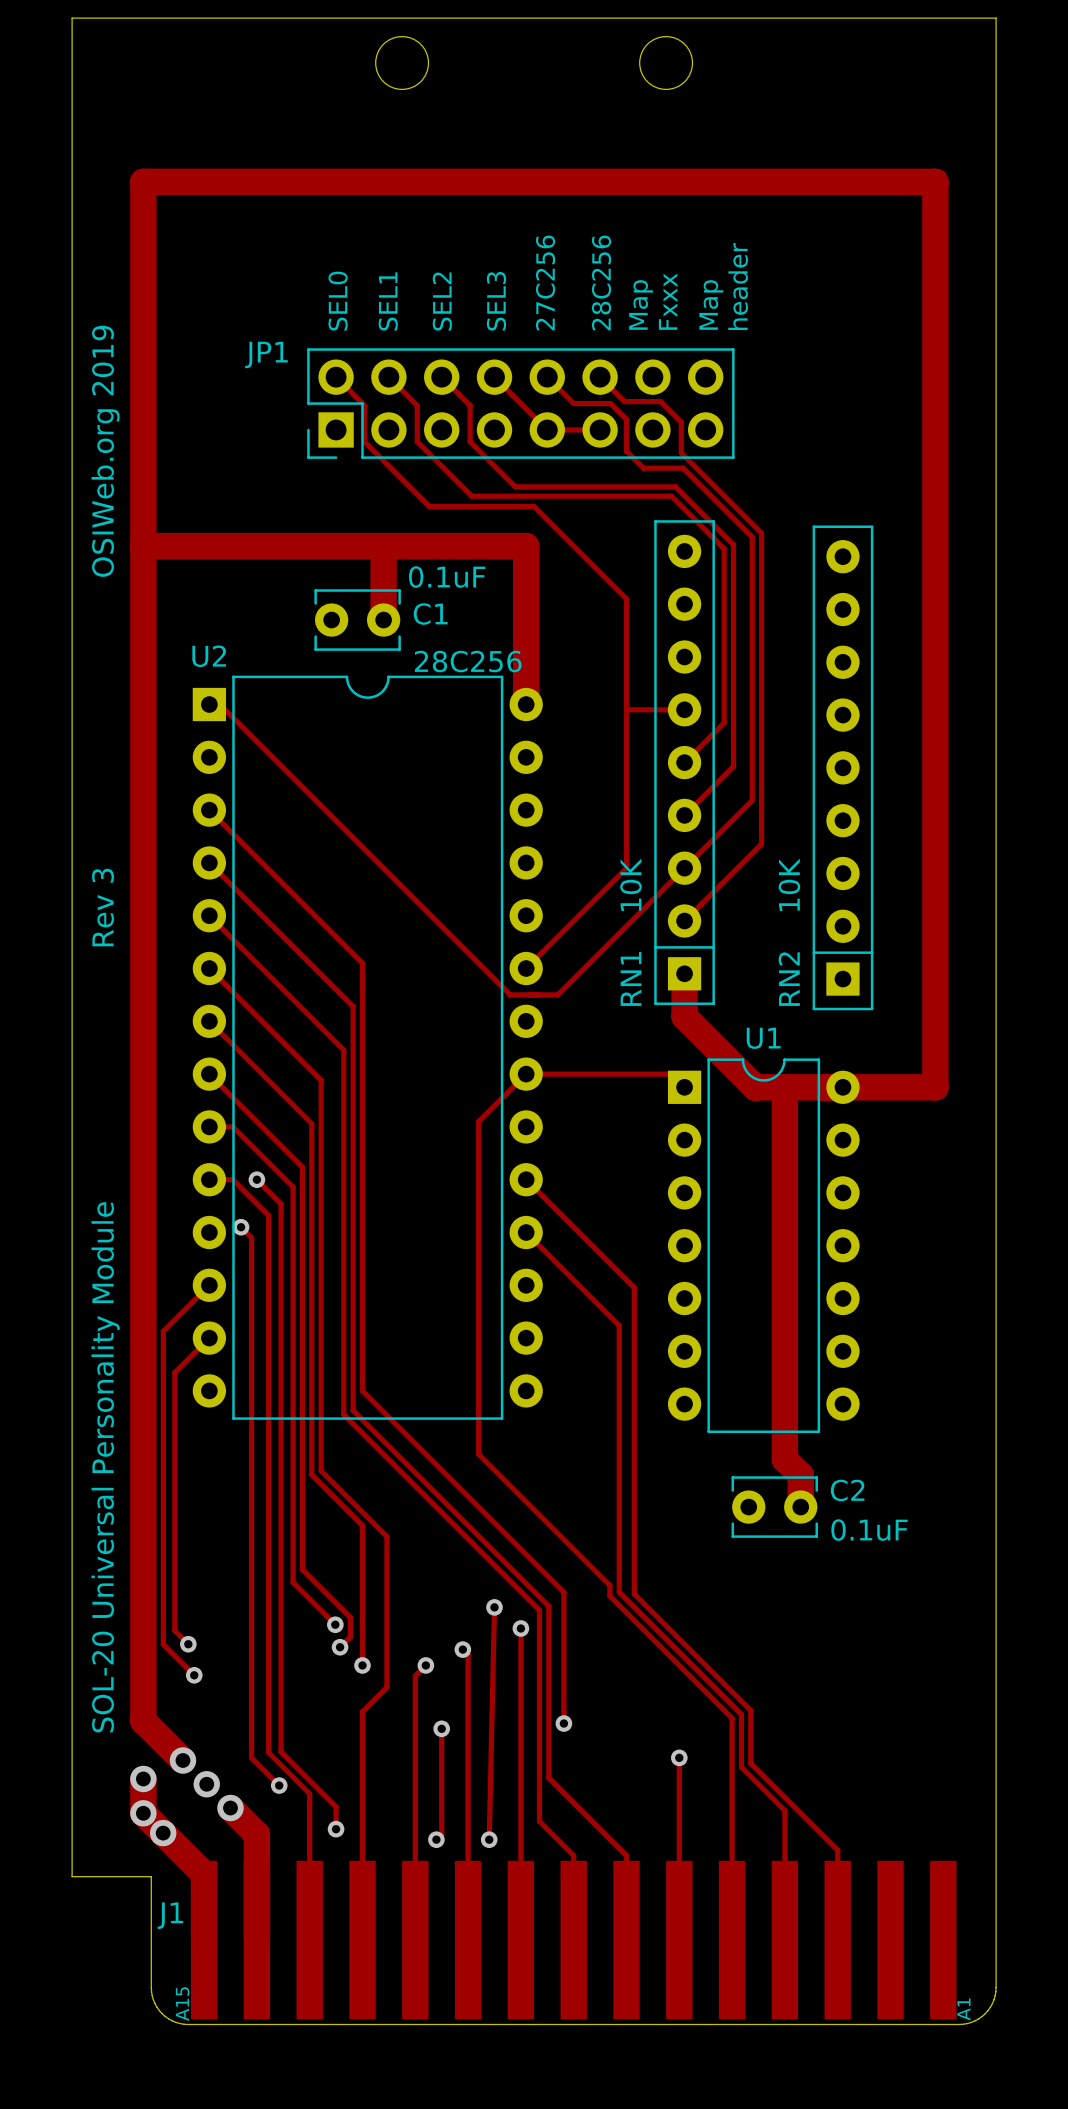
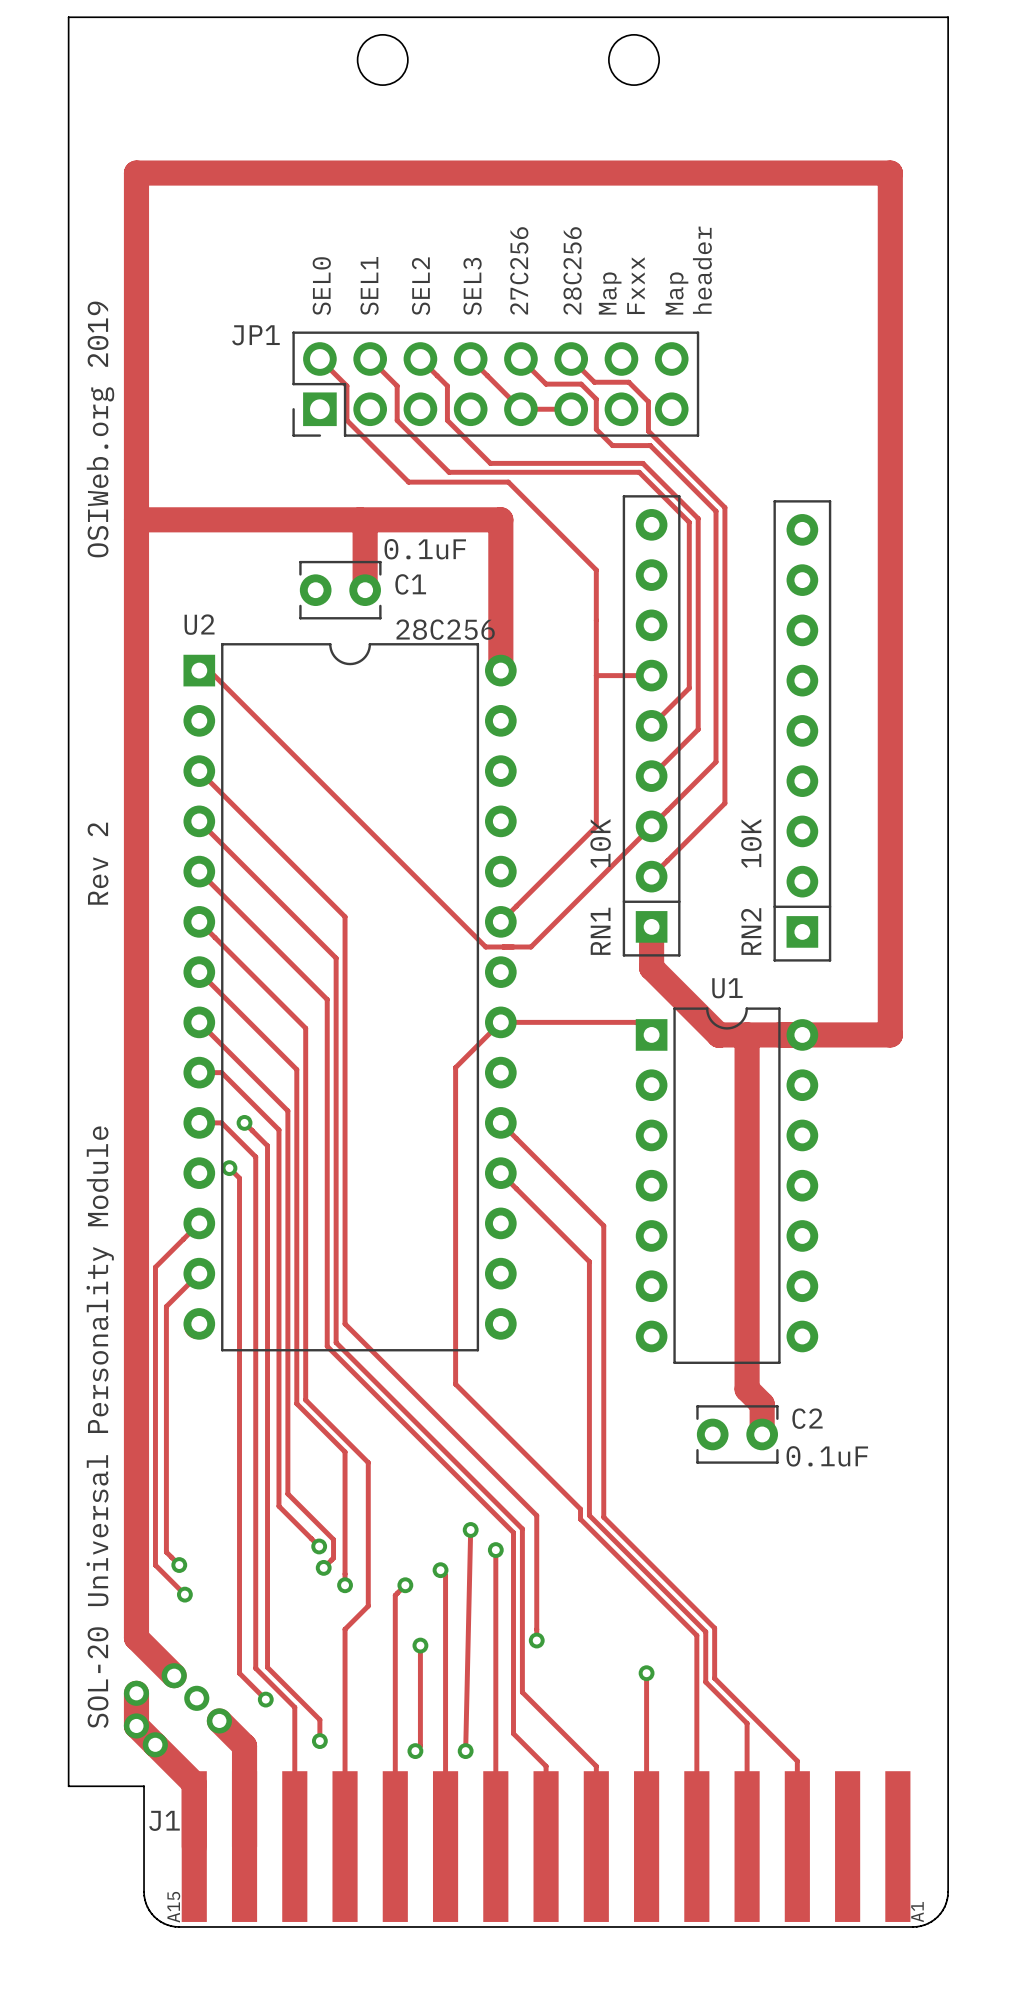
text: Rev 3 (103, 907) -> Rev 2 (98, 863)
text position: SOL-20 Universal Personality Module (105, 1467) -> SOL-20 Universal Personality Module (100, 1427)

